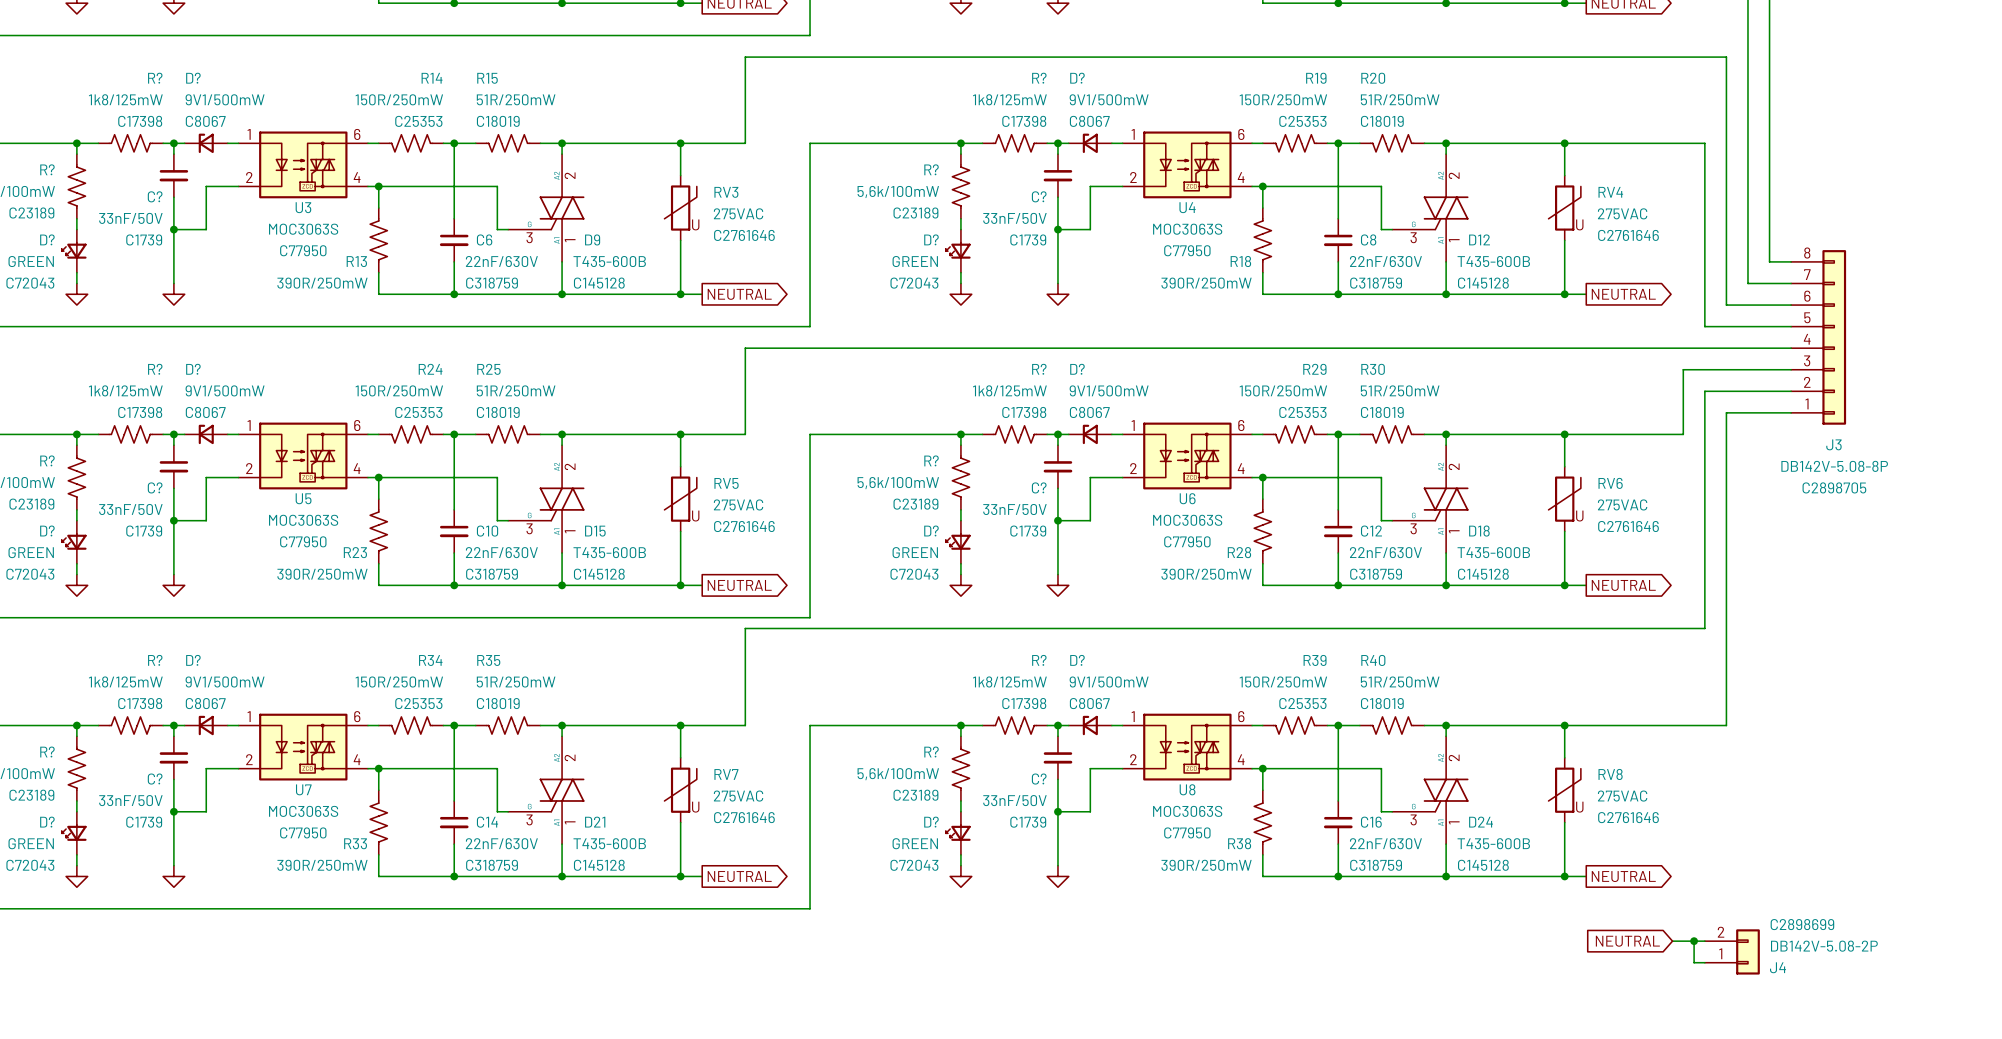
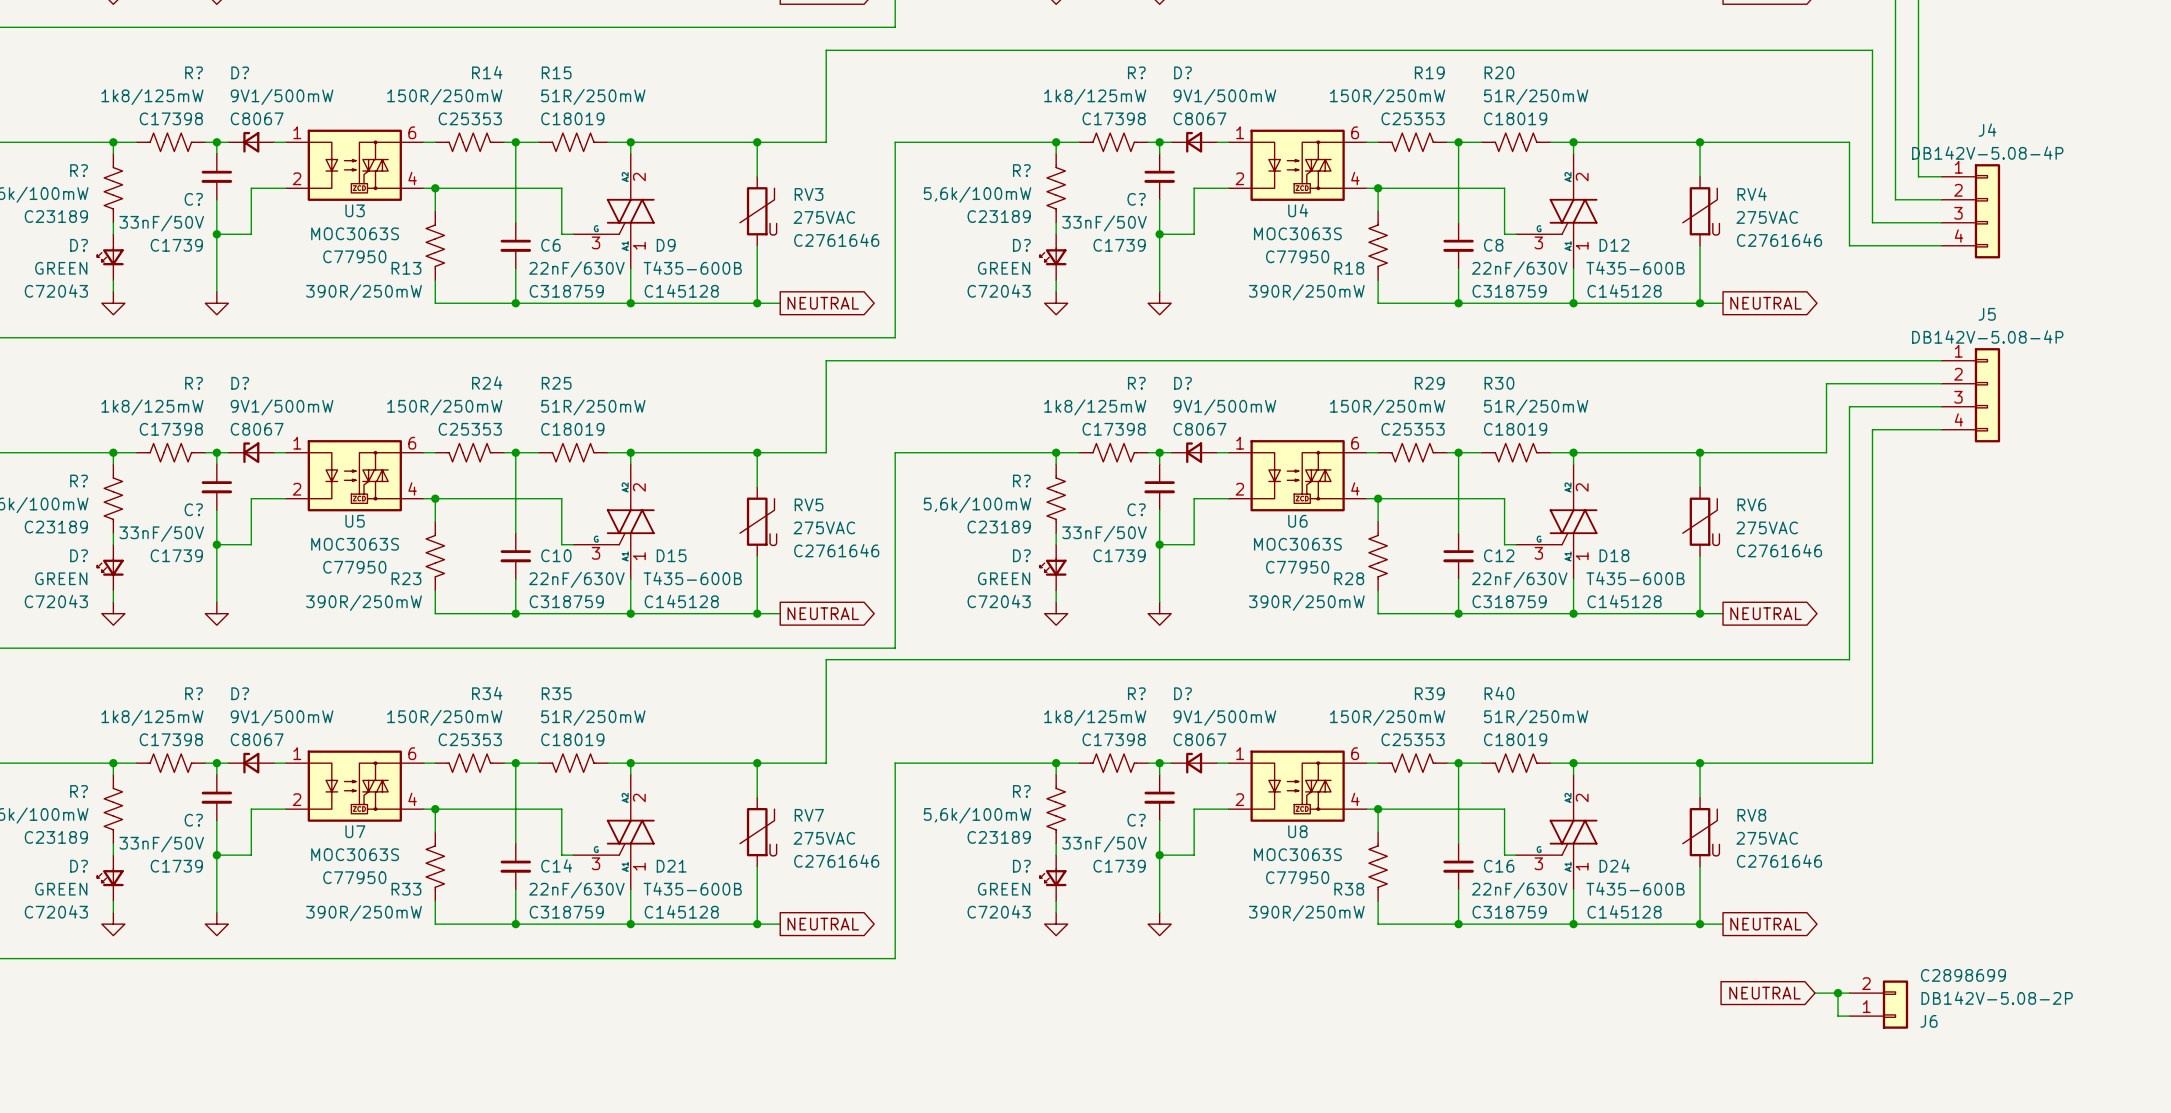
wire: (1769, 175) (1769, 261) (1791, 261) -> (1918, 176) (1941, 176)
wire: (1747, 197) (1747, 283) (1791, 283) -> (1895, 199) (1941, 199)
J4: none -> DB142V-5.08-4P (1970, 211)
wire: (1726, 218) (1726, 305) (1791, 305) -> (1872, 222) (1941, 222)
wire: (1704, 240) (1704, 326) (1791, 326) -> (1849, 245) (1941, 245)
J3: DB142V-5.08-8P (1818, 337) -> none
J5: none -> DB142V-5.08-4P (1970, 395)
J4 name: J4 (1777, 967) -> J6 (1928, 1021)

